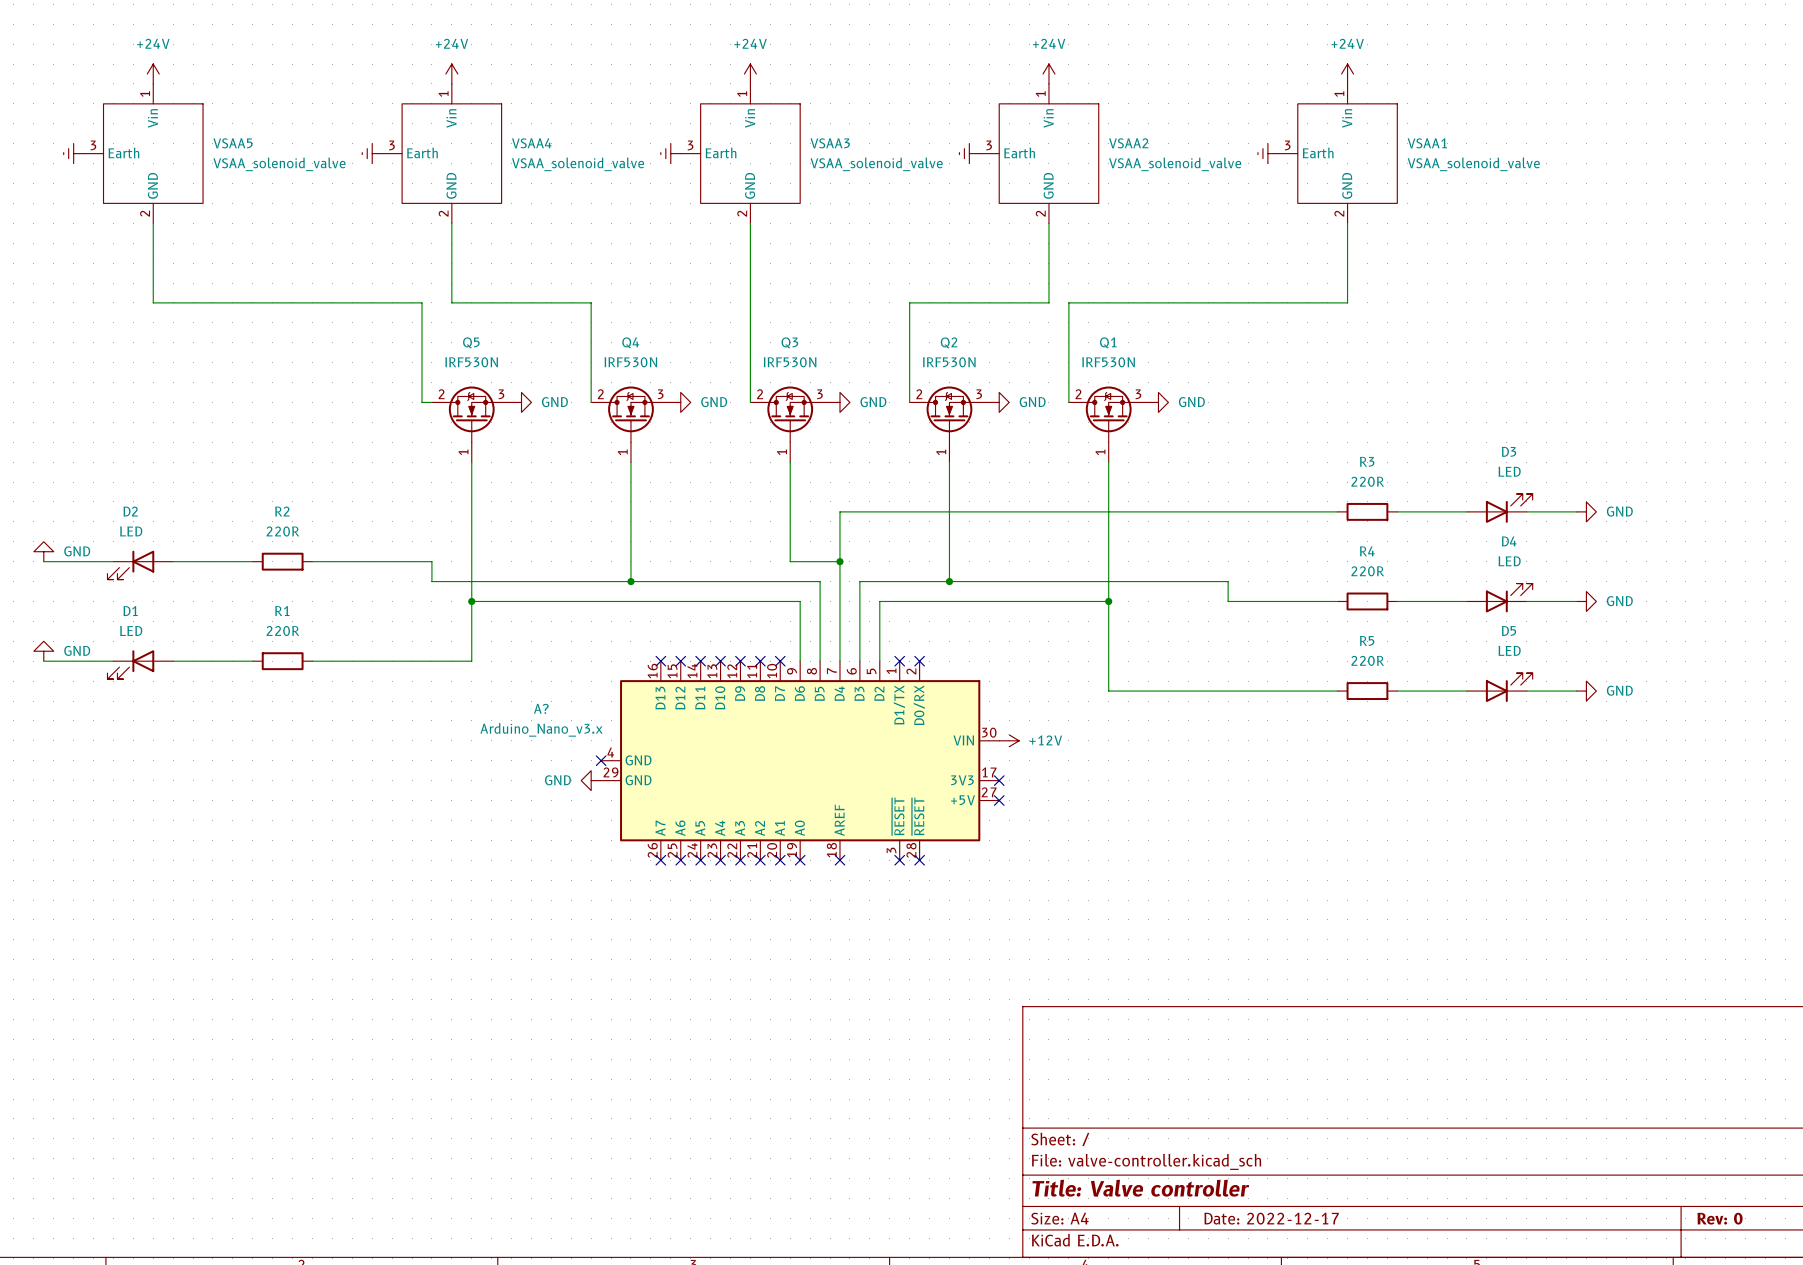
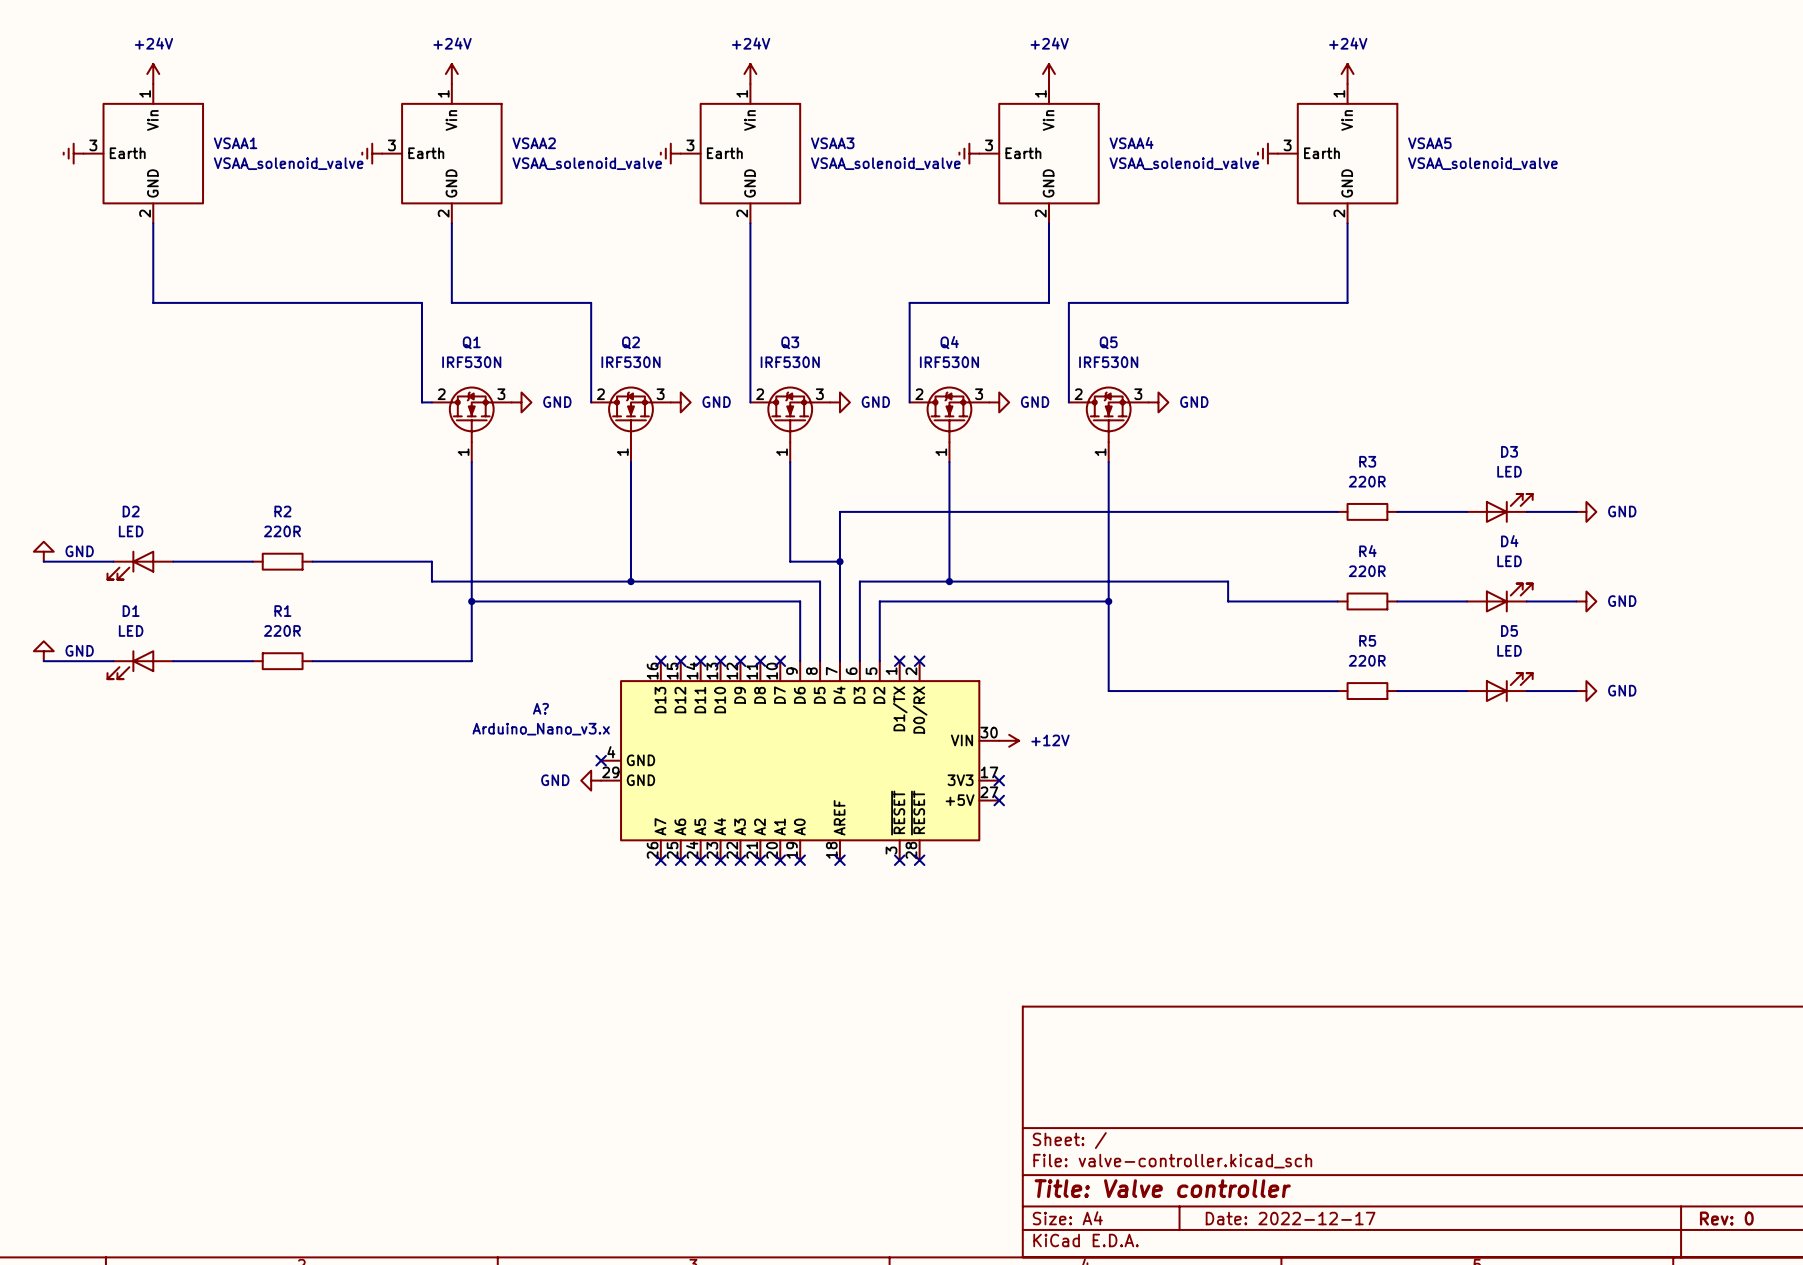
VSAA5 name: VSAA5 (233, 143) -> VSAA1 (235, 143)
VSAA4 name: VSAA4 (531, 143) -> VSAA2 (534, 143)
VSAA2 name: VSAA2 (1128, 143) -> VSAA4 (1131, 143)
VSAA1 name: VSAA1 (1427, 143) -> VSAA5 (1429, 143)
Q5 name: Q5 (471, 342) -> Q1 (471, 342)
Q4 name: Q4 (630, 342) -> Q2 (630, 342)
Q2 name: Q2 (949, 342) -> Q4 (949, 342)
Q1 name: Q1 (1108, 342) -> Q5 (1108, 342)

